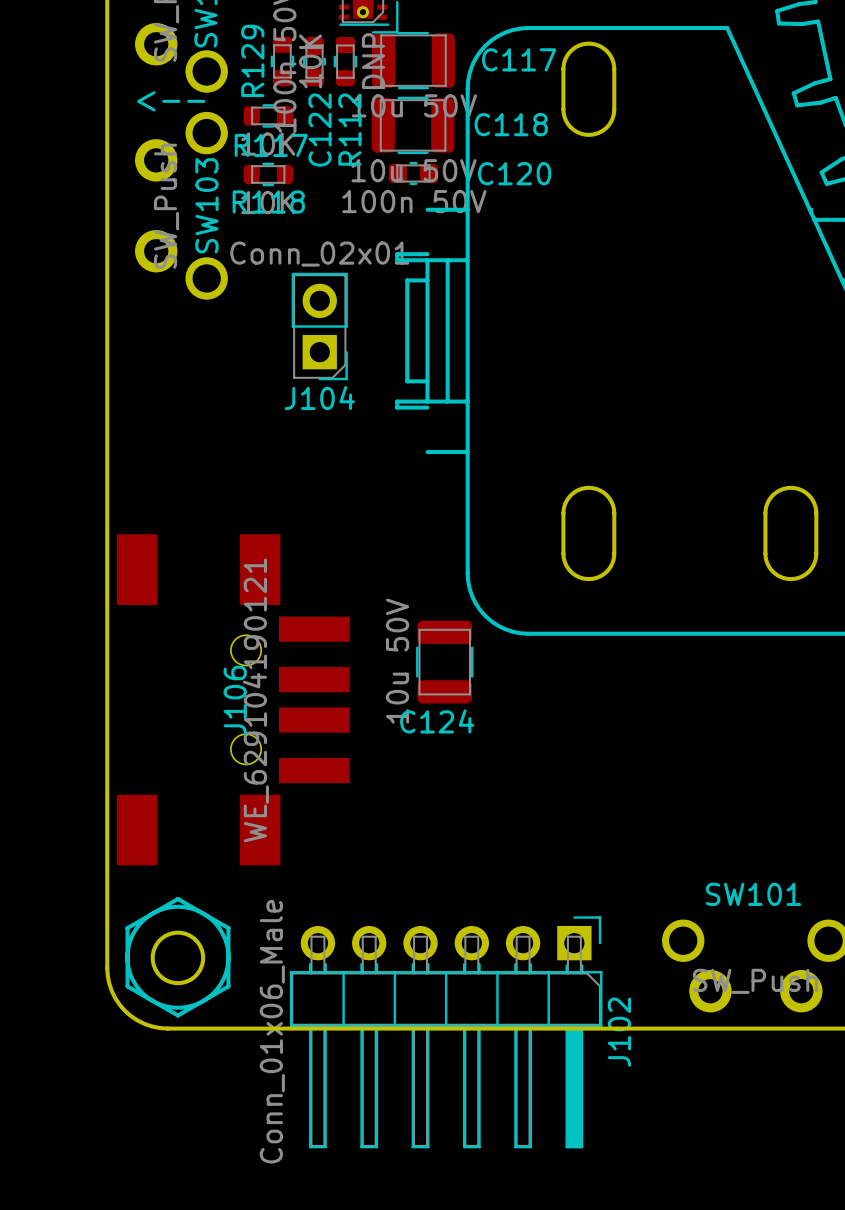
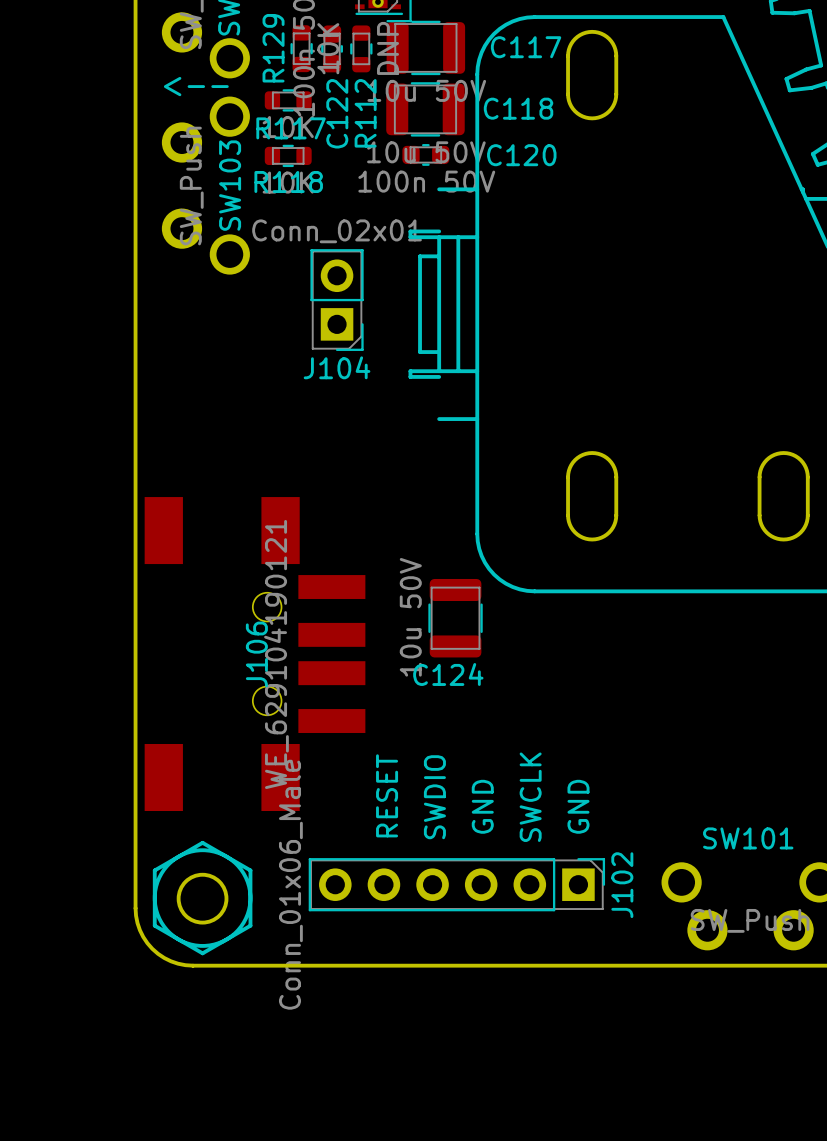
text: none -> RESET (387, 795)
text: none -> SWDIO (434, 797)
text: none -> SWCLK (530, 797)
text: none -> GND (482, 806)
text: none -> GND (578, 806)
J102 footprint: [289, 916, 603, 1149] -> [308, 858, 606, 912]

